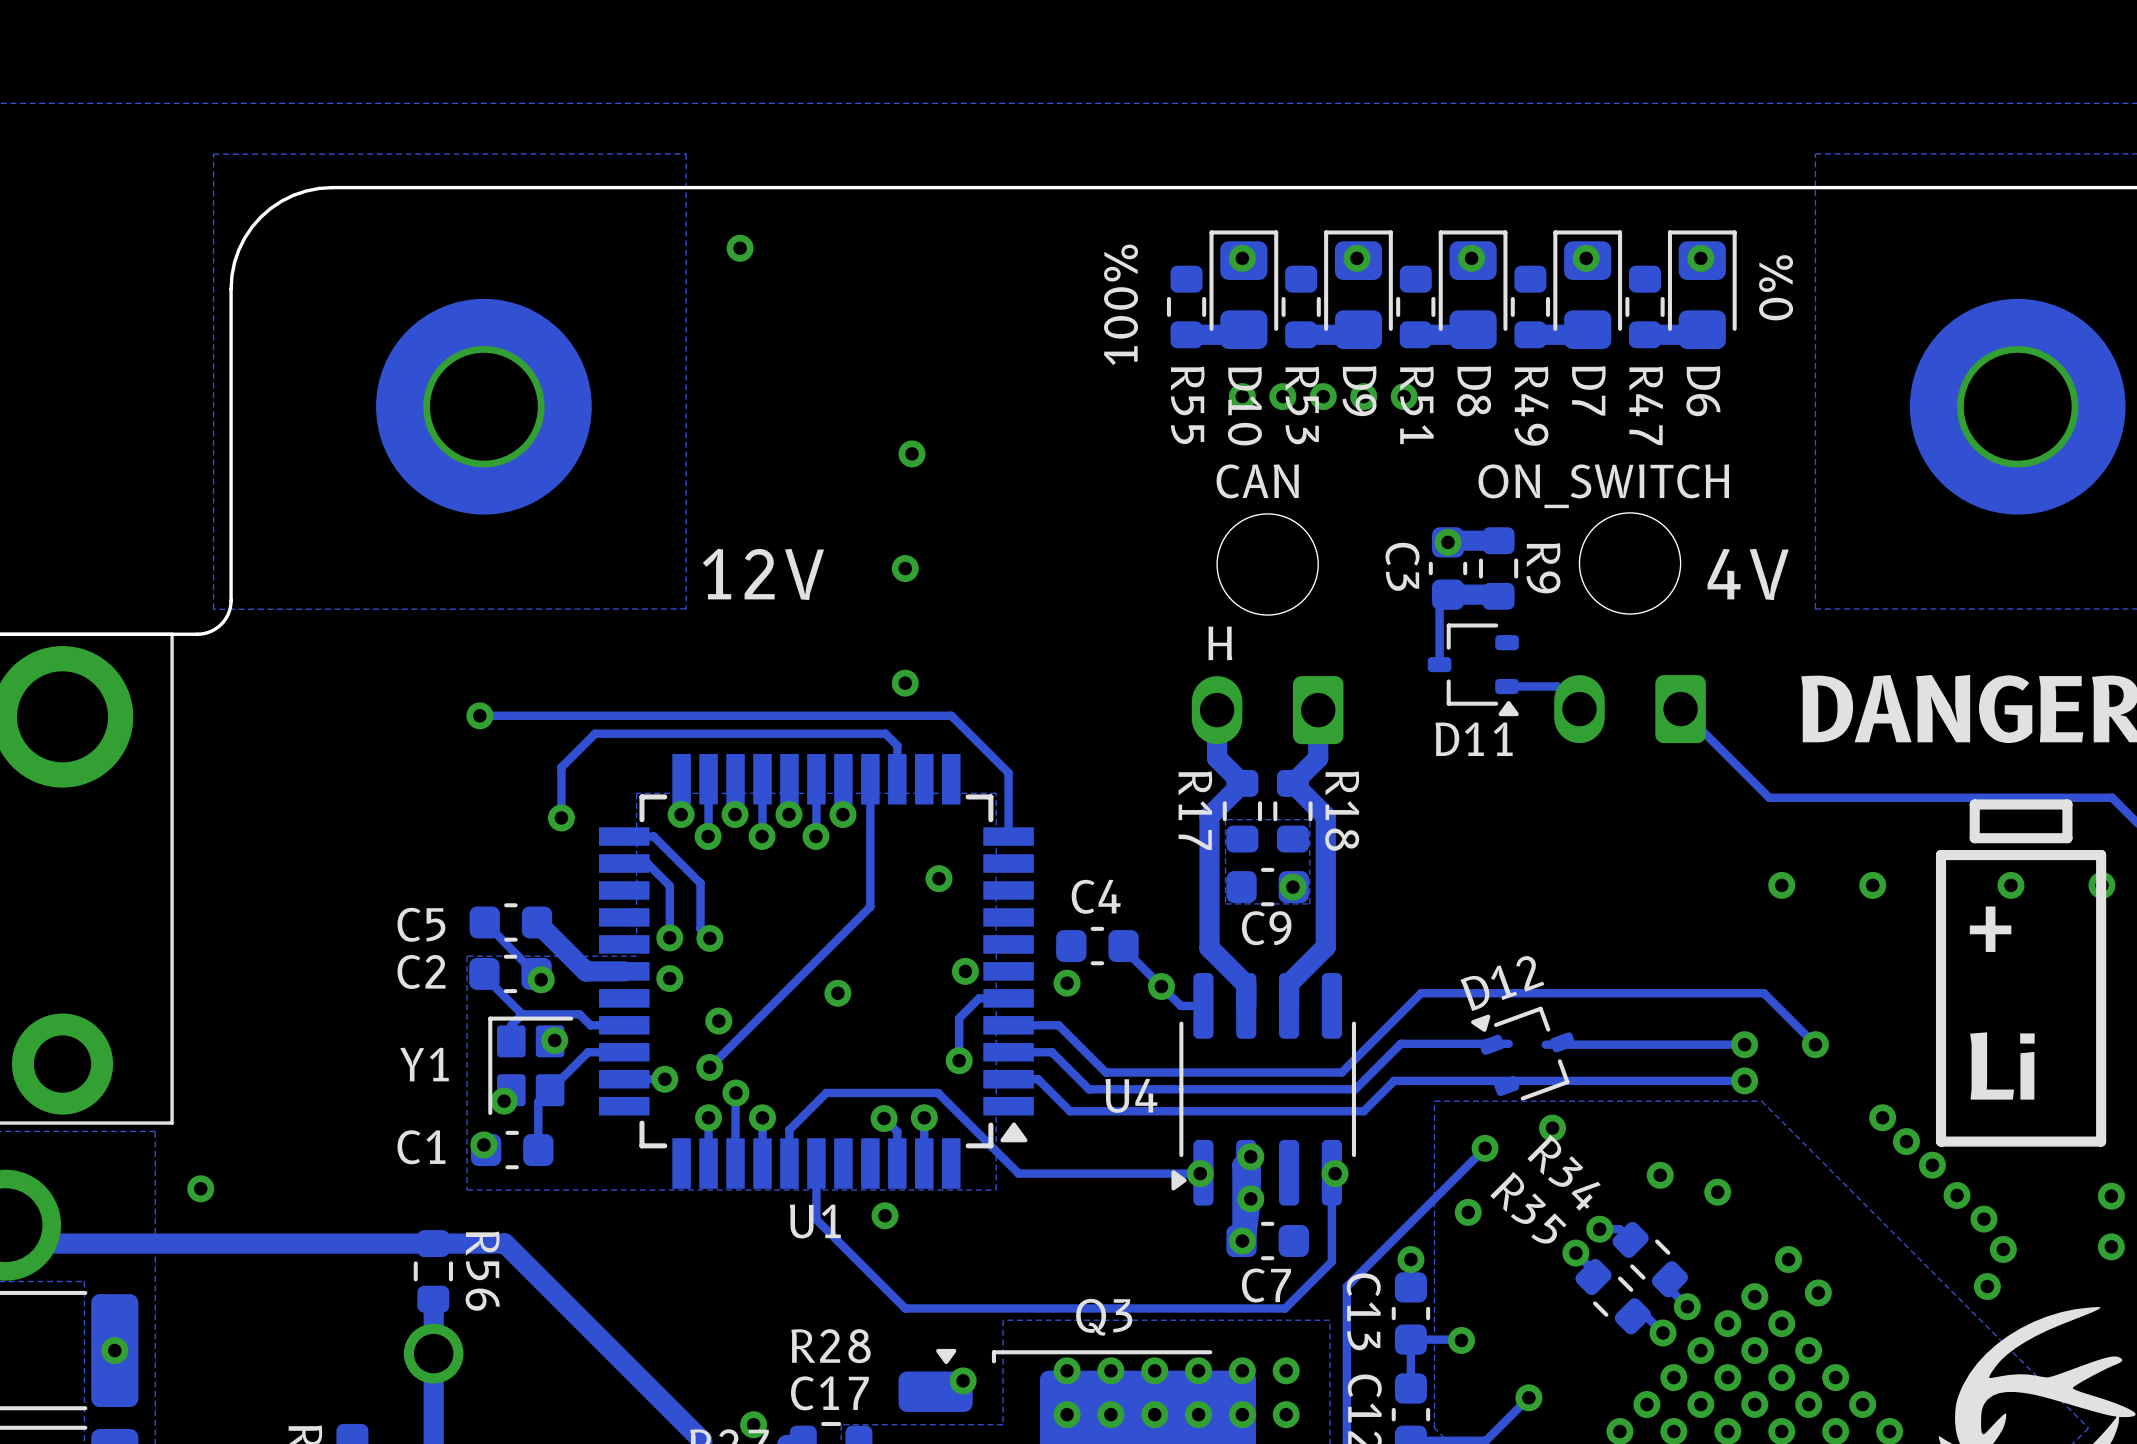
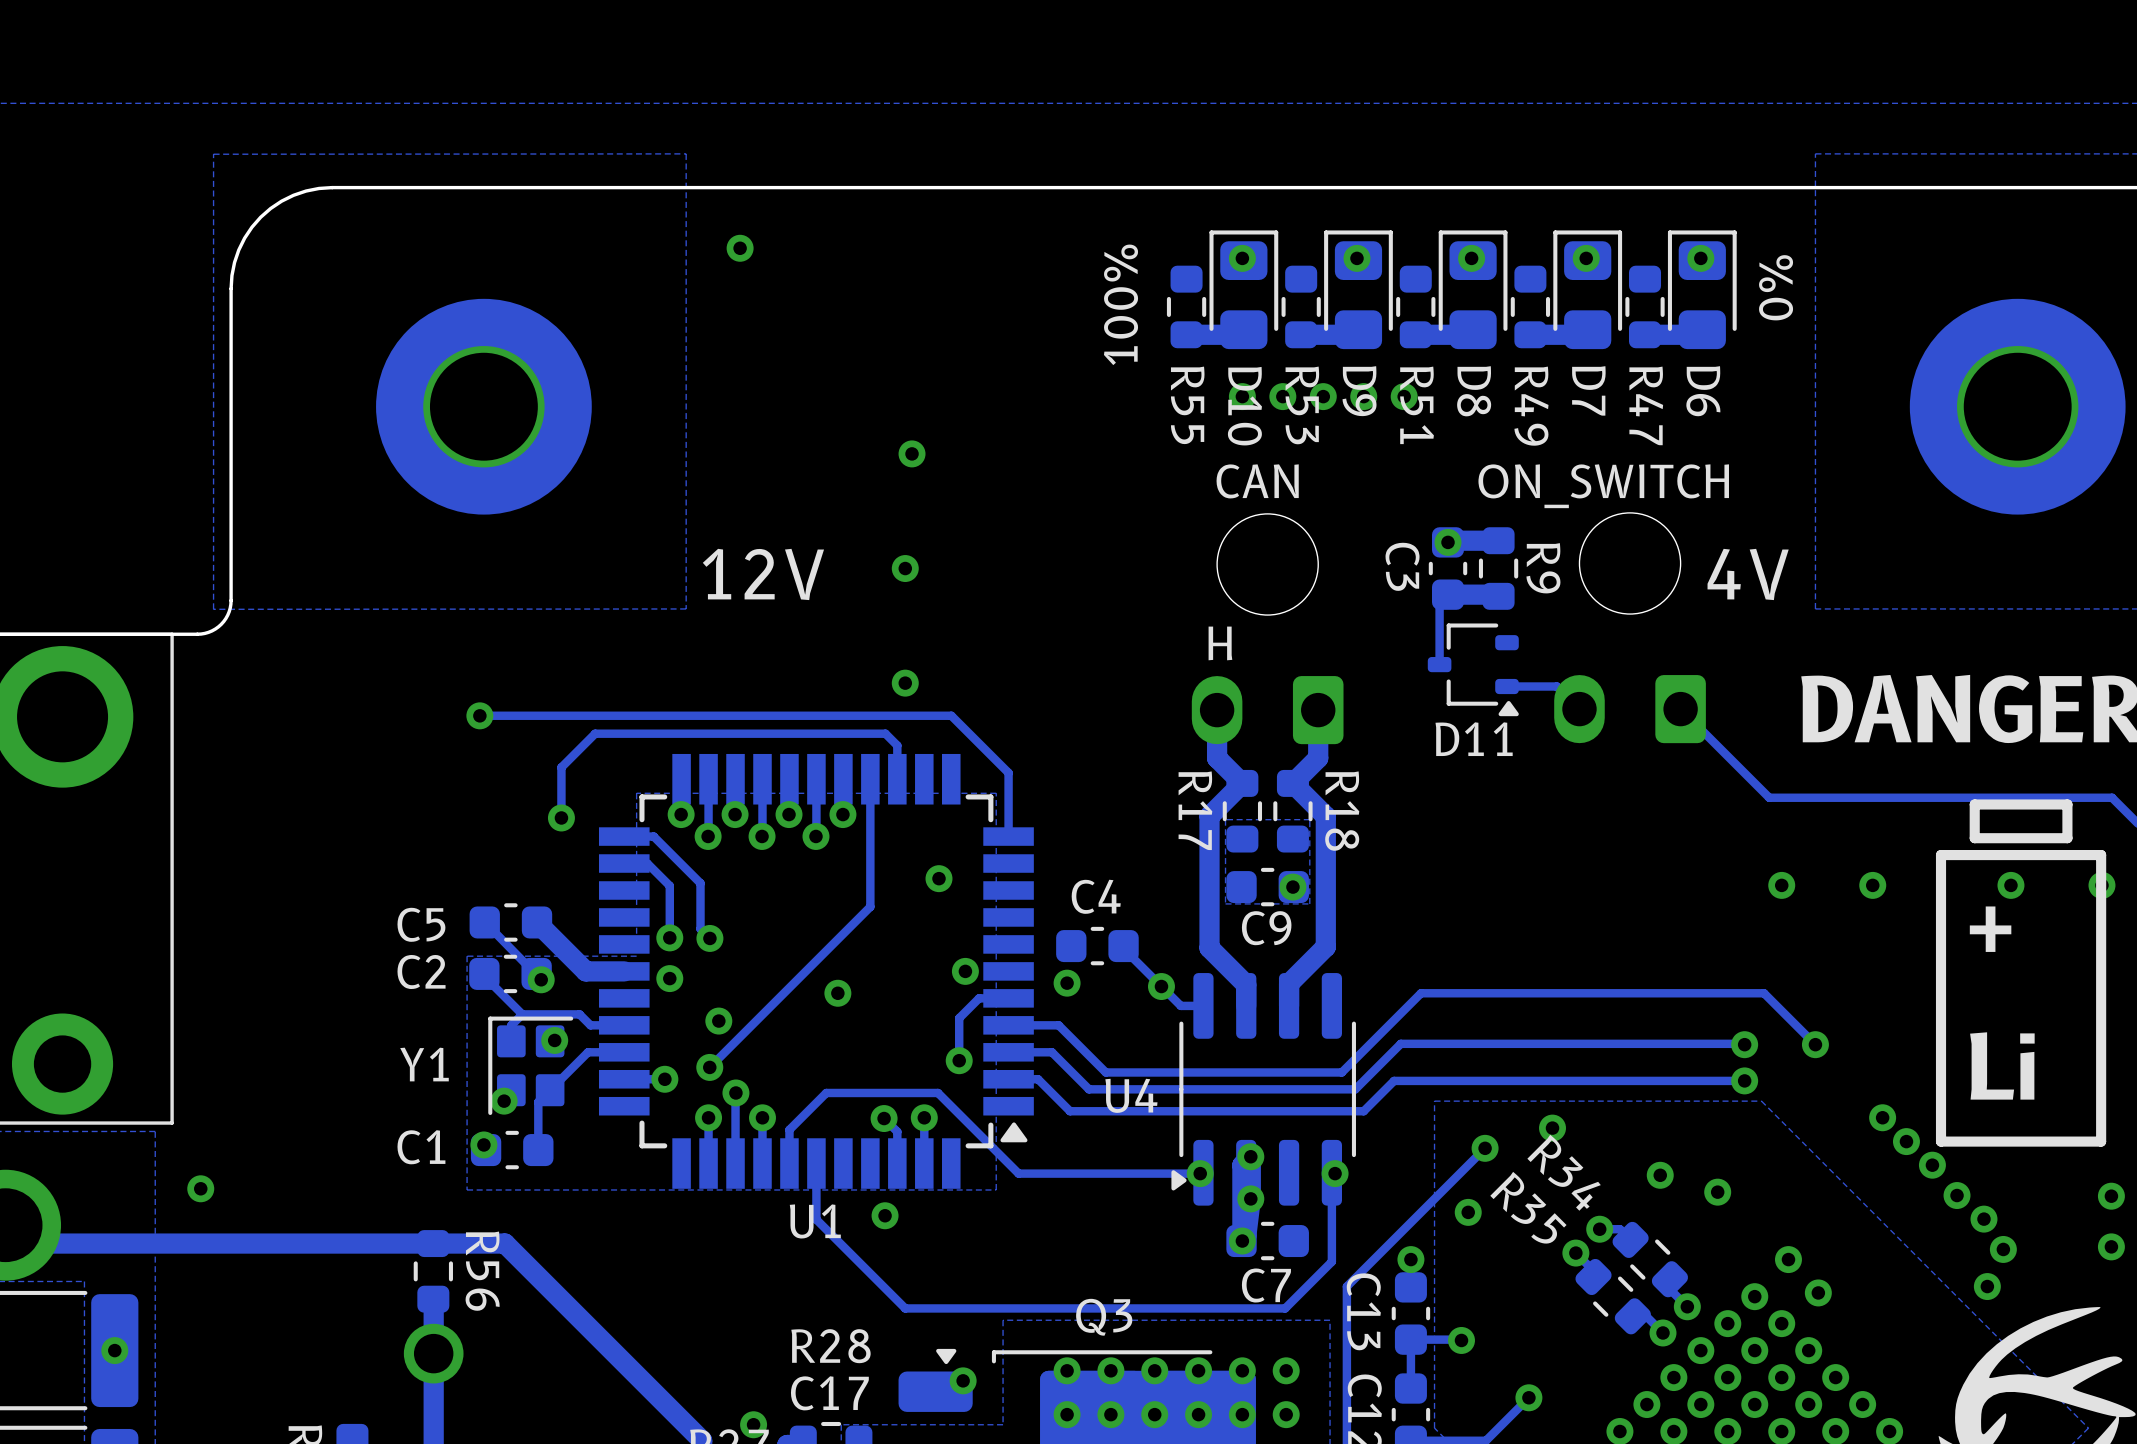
track: (1744, 1044) (1545, 1044) -> (1743, 1043) (1508, 1043)
D12: (1523, 1053) -> none

